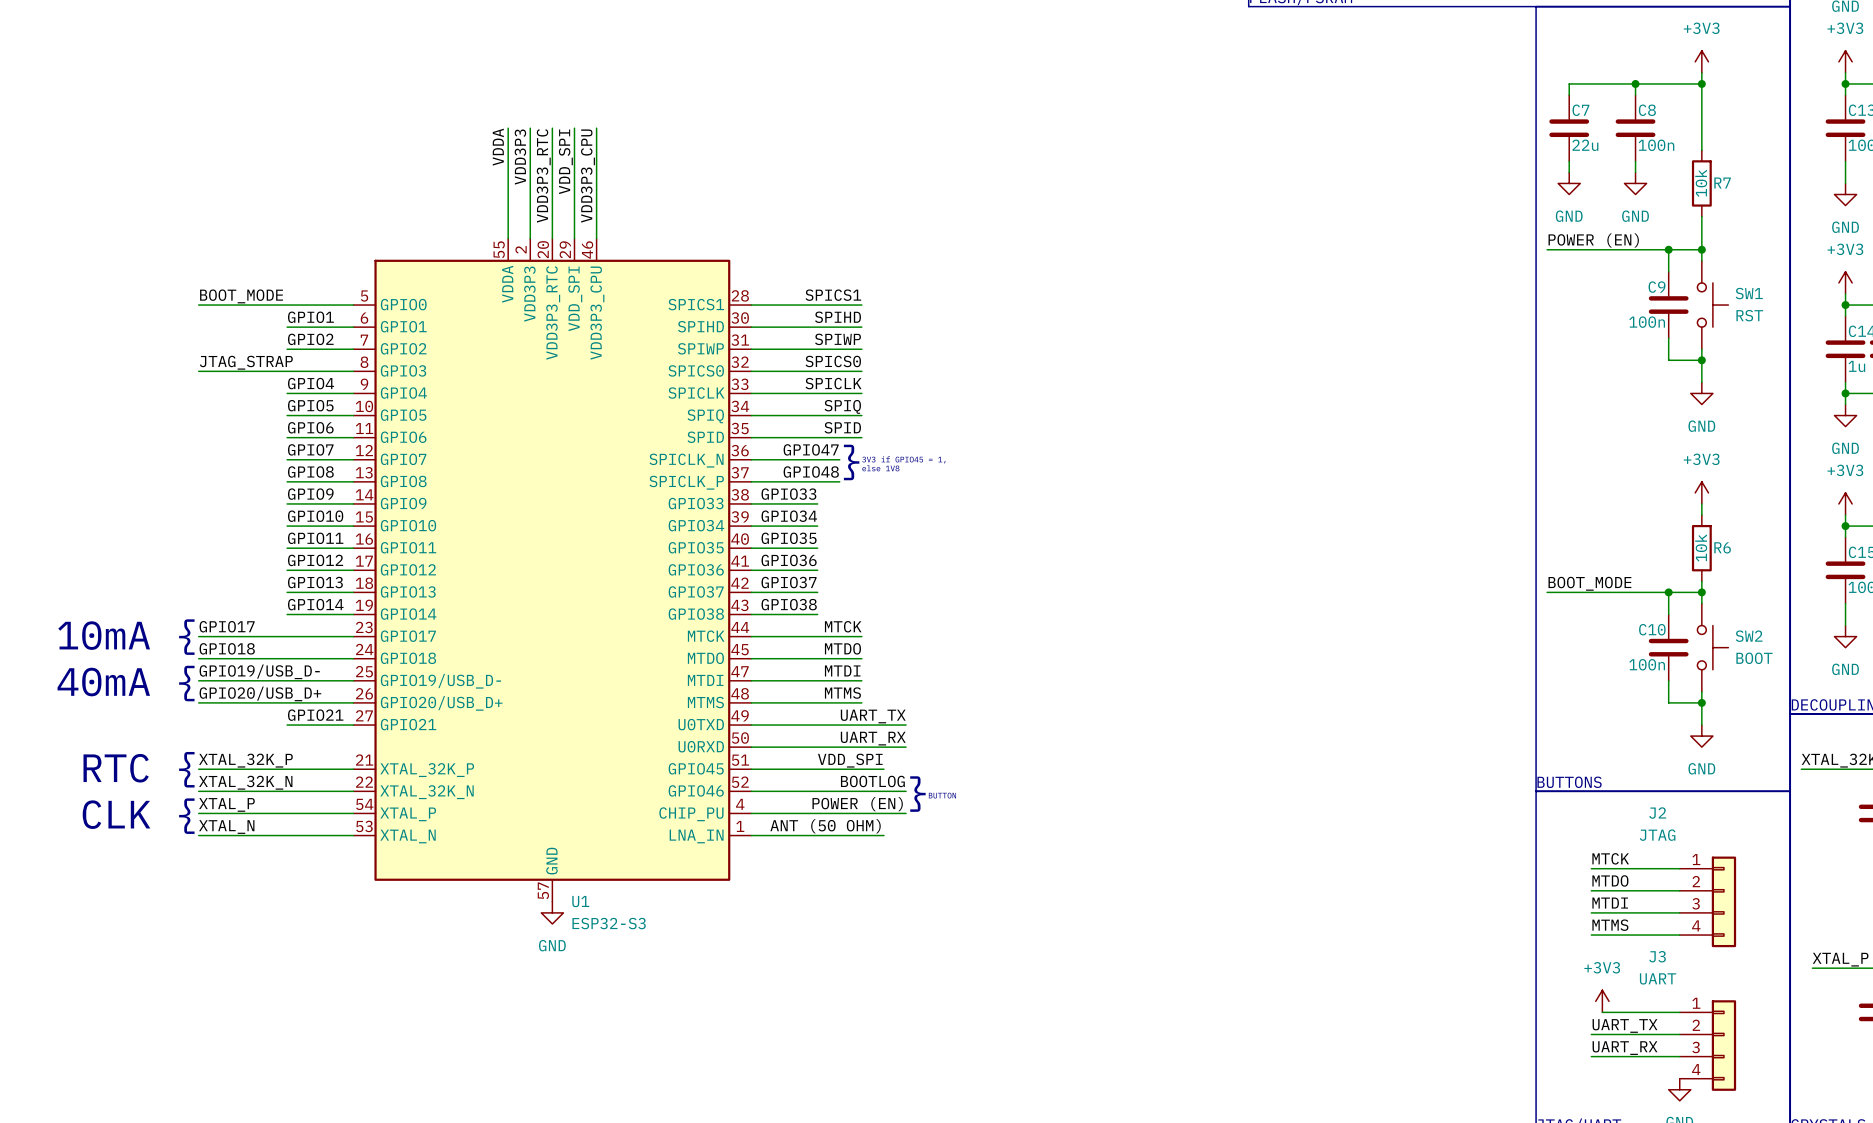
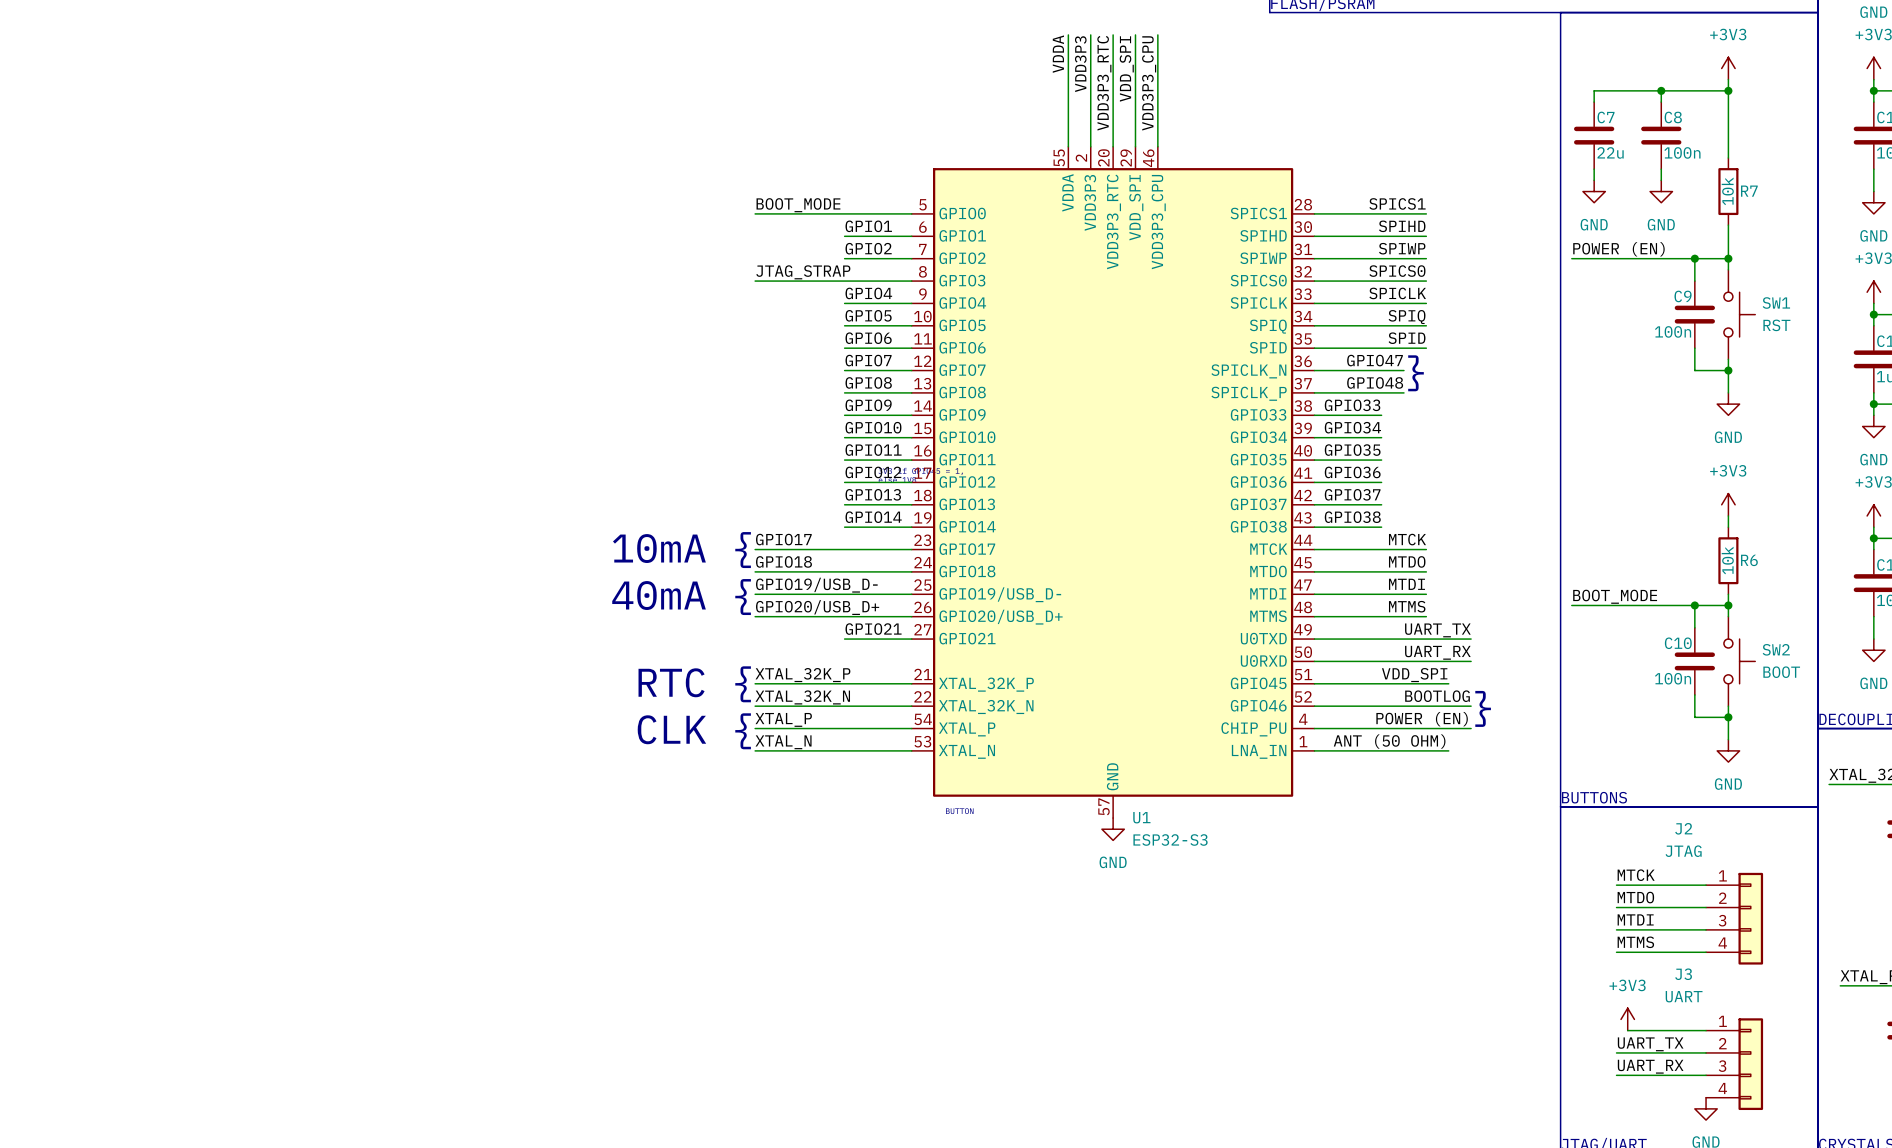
wire: none -> (1068, 34) (1068, 146)
wire: none -> (1090, 34) (1090, 146)
wire: none -> (1113, 34) (1113, 146)
wire: none -> (1135, 34) (1135, 146)
wire: none -> (1157, 34) (1157, 146)
label: none -> VDDA (1058, 54)
label: none -> VDD3P3 (1080, 64)
label: none -> VDD_SPI (1126, 68)
label: none -> VDD3P3_RTC (1104, 83)
label: none -> VDD3P3_CPU (1149, 83)
wire: (508, 128) (508, 238) -> none
wire: (530, 128) (530, 238) -> none
wire: (552, 128) (552, 238) -> none
wire: (574, 128) (574, 238) -> none
wire: (596, 128) (596, 238) -> none
label: VDDA (498, 147) -> none
label: VDD3P3 (520, 157) -> none
label: VDD_SPI (565, 161) -> none
label: VDD3P3_RTC (543, 175) -> none
label: VDD3P3_CPU (587, 176) -> none
label: none -> SPICS1 (1397, 203)
label: none -> BOOT_MODE (798, 205)
wire: none -> (755, 213) (911, 213)
wire: none -> (1314, 213) (1426, 213)
label: none -> GPIO1 (868, 226)
label: none -> SPIHD (1402, 226)
wire: none -> (844, 236) (911, 236)
wire: none -> (1314, 236) (1426, 236)
label: none -> GPIO2 (868, 248)
label: none -> SPIWP (1402, 248)
wire: none -> (844, 258) (911, 258)
wire: none -> (1314, 258) (1426, 258)
label: none -> SPICS0 (1397, 271)
label: none -> JTAG_STRAP (803, 272)
wire: none -> (755, 281) (911, 281)
wire: none -> (1314, 281) (1426, 281)
label: none -> GPIO4 (868, 293)
label: none -> SPICLK (1397, 293)
wire: none -> (844, 303) (911, 303)
wire: none -> (1314, 303) (1426, 303)
label: SPICS1 (833, 295) -> none
label: BOOT_MODE (241, 296) -> none
wire: (198, 305) (353, 305) -> none
wire: (751, 305) (861, 305) -> none
label: none -> GPIO5 (868, 315)
label: none -> SPIQ (1407, 317)
wire: none -> (844, 325) (911, 325)
wire: none -> (1314, 325) (1426, 325)
label: GPIO1 (310, 317) -> none
label: SPIHD (838, 317) -> none
wire: (287, 327) (353, 327) -> none
wire: (751, 327) (861, 327) -> none
label: none -> GPIO6 (868, 338)
label: none -> SPID (1407, 338)
wire: none -> (844, 348) (911, 348)
wire: none -> (1314, 348) (1426, 348)
label: GPIO2 (310, 339) -> none
label: SPIWP (838, 339) -> none
wire: (287, 349) (353, 349) -> none
wire: (751, 349) (861, 349) -> none
label: none -> GPIO7 (868, 360)
label: none -> GPIO47 (1375, 360)
wire: none -> (844, 370) (911, 370)
wire: none -> (1314, 370) (1403, 370)
label: SPICS0 (833, 361) -> none
label: JTAG_STRAP (246, 362) -> none
text: none -> } (1416, 373)
wire: (198, 371) (353, 371) -> none
wire: (751, 371) (861, 371) -> none
label: none -> GPIO8 (868, 382)
label: none -> GPIO48 (1375, 382)
wire: none -> (844, 392) (911, 392)
wire: none -> (1314, 392) (1403, 392)
label: GPIO4 (311, 383) -> none
label: SPICLK (833, 383) -> none
wire: (287, 393) (353, 393) -> none
wire: (751, 393) (861, 393) -> none
label: none -> GPIO9 (868, 405)
label: none -> GPIO33 (1352, 405)
wire: none -> (1314, 415) (1381, 415)
label: GPIO5 (310, 405) -> none
label: SPIQ (842, 406) -> none
wire: (287, 415) (353, 415) -> none
wire: (751, 415) (861, 415) -> none
label: none -> GPIO10 (873, 427)
label: none -> GPIO34 (1352, 427)
wire: none -> (1314, 437) (1381, 437)
label: GPIO6 (310, 427) -> none
label: SPID (842, 427) -> none
wire: (287, 437) (353, 437) -> none
wire: (751, 437) (861, 437) -> none
label: none -> GPIO11 (873, 450)
label: none -> GPIO35 (1352, 450)
wire: none -> (1314, 460) (1381, 460)
label: GPIO7 (310, 449) -> none
label: GPIO47 (811, 449) -> none
wire: (287, 459) (353, 459) -> none
wire: (751, 459) (839, 459) -> none
label: none -> GPIO12 (873, 472)
label: none -> GPIO36 (1352, 472)
text: } (851, 462) -> none
wire: none -> (1314, 482) (1381, 482)
label: GPIO8 (310, 472) -> none
label: GPIO48 (811, 472) -> none
wire: (287, 481) (353, 481) -> none
wire: (751, 481) (839, 481) -> none
label: none -> GPIO13 (873, 494)
label: none -> GPIO37 (1352, 494)
wire: none -> (1314, 504) (1381, 504)
label: GPIO9 (310, 494) -> none
label: GPIO33 (788, 494) -> none
wire: (287, 503) (353, 503) -> none
wire: (751, 503) (817, 503) -> (844, 415) (911, 415)
label: none -> GPIO14 (873, 517)
label: none -> GPIO38 (1352, 517)
wire: none -> (1314, 527) (1381, 527)
label: GPIO10 (315, 516) -> none
label: GPIO34 (789, 516) -> none
wire: (287, 526) (353, 526) -> none
wire: (751, 526) (817, 526) -> (844, 437) (911, 437)
label: none -> GPIO17 (783, 539)
label: none -> MTCK (1407, 539)
text: none -> 10mA { (681, 550)
wire: none -> (755, 549) (911, 549)
wire: none -> (1314, 549) (1426, 549)
label: GPIO11 (315, 538) -> none
label: GPIO35 (789, 538) -> none
wire: (287, 548) (353, 548) -> none
wire: (751, 548) (817, 548) -> (844, 460) (911, 460)
label: none -> GPIO18 (783, 561)
label: none -> MTDO (1407, 561)
wire: none -> (755, 571) (911, 571)
wire: none -> (1314, 571) (1426, 571)
label: GPIO12 (315, 560) -> none
label: GPIO36 (789, 560) -> none
wire: (287, 570) (353, 570) -> none
U1 position: (552, 570) -> (1113, 482)
wire: (751, 570) (817, 570) -> (844, 482) (911, 482)
label: none -> MTDI (1406, 584)
label: none -> GPIO19/USB_D- (816, 585)
wire: none -> (755, 594) (911, 594)
wire: none -> (1314, 594) (1426, 594)
label: GPIO13 (315, 582) -> none
label: GPIO37 (789, 582) -> none
text: none -> 40mA { (681, 597)
wire: (287, 592) (353, 592) -> none
wire: (751, 592) (817, 592) -> (844, 504) (911, 504)
label: none -> MTMS (1407, 606)
label: none -> GPIO20/USB_D+ (817, 607)
wire: none -> (1314, 616) (1426, 616)
label: GPIO14 (315, 604) -> none
label: GPIO38 (789, 604) -> none
wire: (287, 614) (353, 614) -> none
wire: (751, 614) (817, 614) -> (844, 527) (911, 527)
label: none -> GPIO21 (873, 629)
label: none -> UART_TX (1437, 630)
wire: none -> (844, 639) (911, 639)
wire: none -> (1314, 639) (1471, 639)
label: GPIO17 (227, 626) -> none
label: MTCK (843, 626) -> none
wire: (198, 636) (353, 636) -> none
wire: (751, 636) (861, 636) -> none
text: 10mA { (126, 637) -> none
label: none -> UART_RX (1437, 652)
wire: none -> (1314, 661) (1471, 661)
label: GPIO18 (227, 648) -> none
label: MTDO (842, 648) -> none
wire: (198, 658) (353, 658) -> none
wire: (751, 658) (861, 658) -> none
label: none -> XTAL_32K_P (802, 675)
label: none -> VDD_SPI (1414, 675)
wire: none -> (1314, 683) (1448, 683)
text: none -> RTC { (694, 684)
label: MTDI (842, 670) -> none
label: GPIO19/USB_D- (259, 671) -> none
wire: (198, 680) (353, 680) -> none
wire: (751, 680) (861, 680) -> none
label: none -> BOOTLOG (1437, 696)
text: 40mA { (126, 683) -> none
label: none -> XTAL_32K_N (802, 697)
wire: none -> (1314, 706) (1471, 706)
label: GPIO20/USB_D+ (260, 693) -> none
label: MTMS (842, 693) -> none
text: none -> } (1483, 708)
wire: (198, 702) (353, 702) -> none
wire: (751, 702) (861, 702) -> none
label: none -> POWER (EN) (1422, 719)
label: none -> XTAL_P (783, 719)
wire: none -> (755, 728) (911, 728)
wire: none -> (1314, 728) (1471, 728)
label: GPIO21 (315, 715) -> none
text: none -> CLK { (694, 731)
label: UART_TX (873, 716) -> none
wire: (287, 725) (353, 725) -> none
wire: (751, 725) (906, 725) -> (755, 683) (911, 683)
label: none -> ANT (50 OHM) (1389, 741)
label: none -> XTAL_N (783, 742)
wire: none -> (1314, 750) (1448, 750)
label: UART_RX (873, 738) -> none
wire: (751, 747) (906, 747) -> (755, 706) (911, 706)
label: XTAL_32K_P (245, 760) -> none
label: VDD_SPI (850, 760) -> none
text: RTC { (139, 769) -> none
wire: (198, 769) (353, 769) -> none
wire: (751, 769) (883, 769) -> none
label: BOOTLOG (872, 781) -> none
label: XTAL_32K_N (245, 782) -> none
wire: (198, 791) (353, 791) -> none
wire: (751, 791) (906, 791) -> (755, 750) (911, 750)
text: } (917, 794) -> none
label: XTAL_P (226, 804) -> none
label: POWER (EN) (857, 804) -> none
wire: (198, 813) (353, 813) -> none
wire: (751, 813) (906, 813) -> (755, 616) (911, 616)
power symbol: none -> GND (1113, 829)
text: CLK { (138, 816) -> none
label: ANT (50 OHM) (825, 826) -> none
label: XTAL_N (226, 827) -> none
wire: (198, 835) (353, 835) -> none
wire: (751, 835) (883, 835) -> none
power symbol: GND (552, 912) -> none

